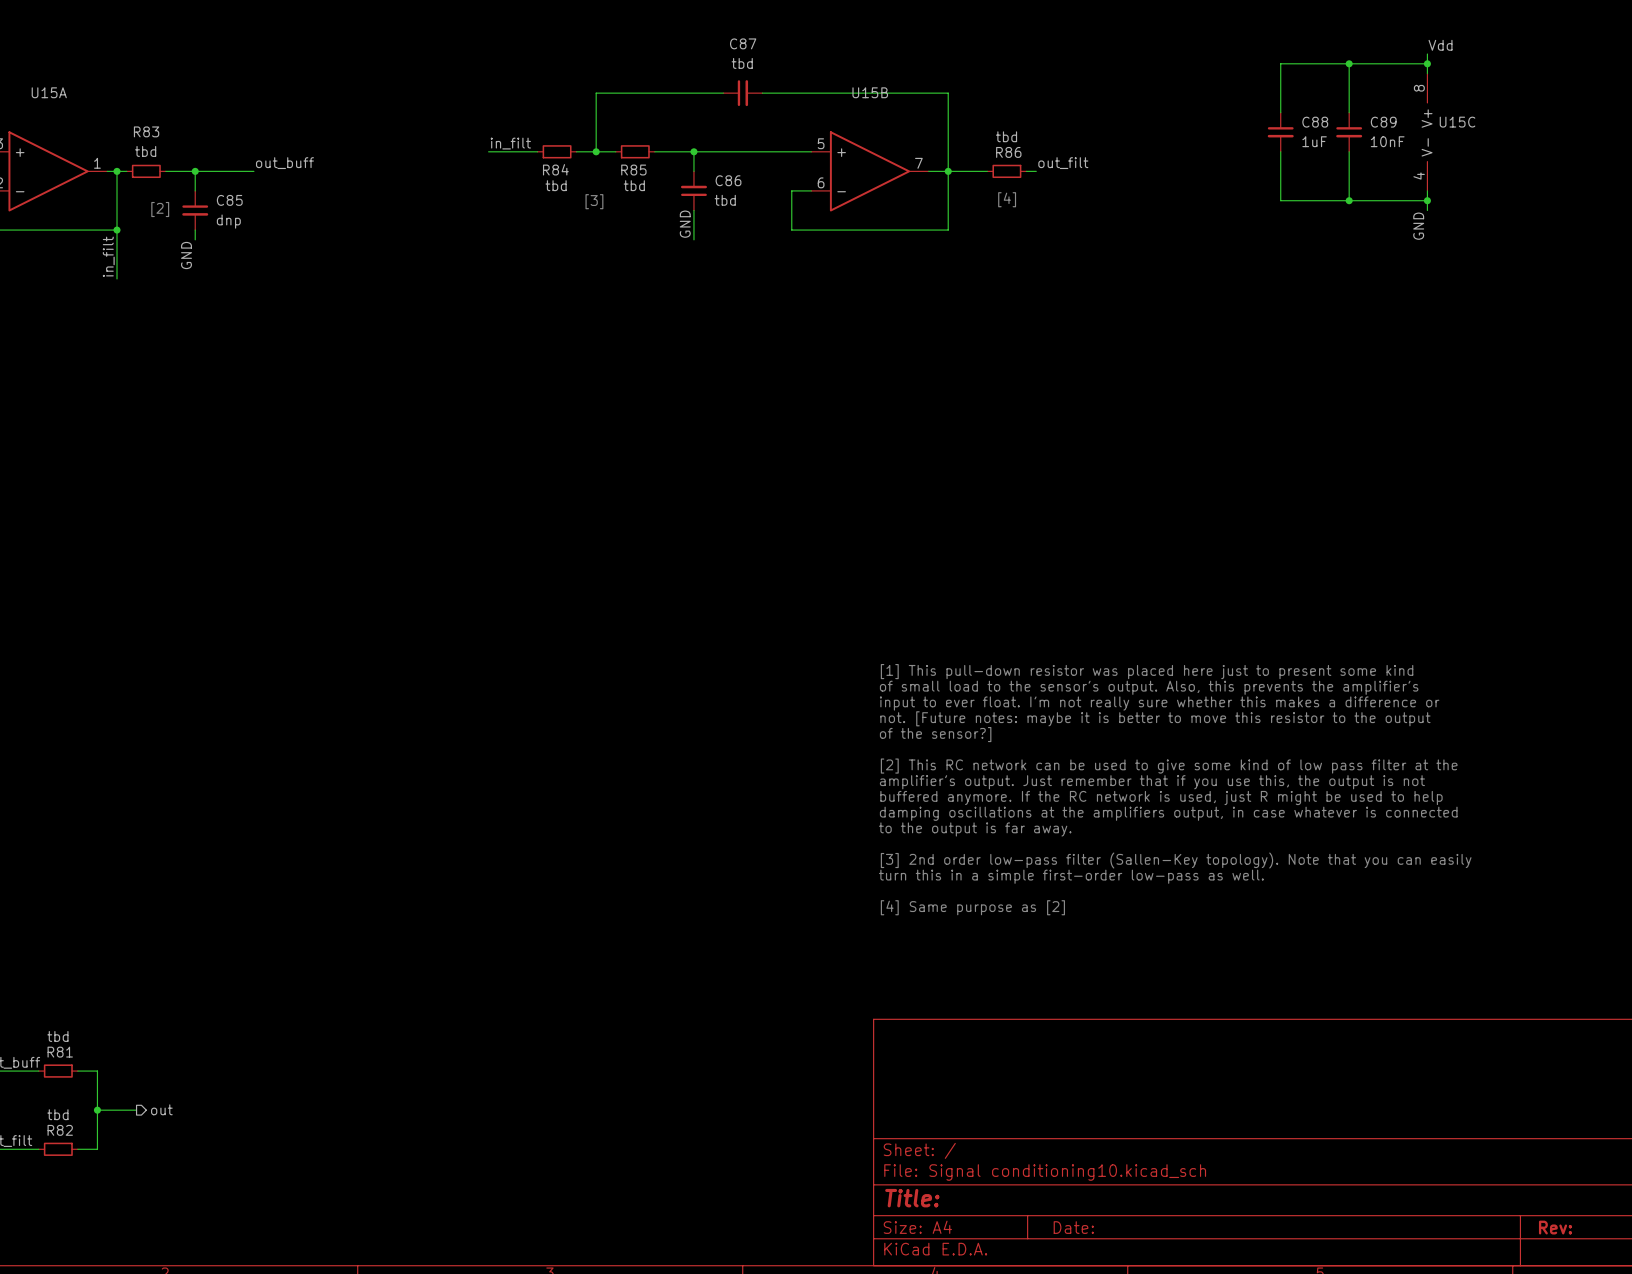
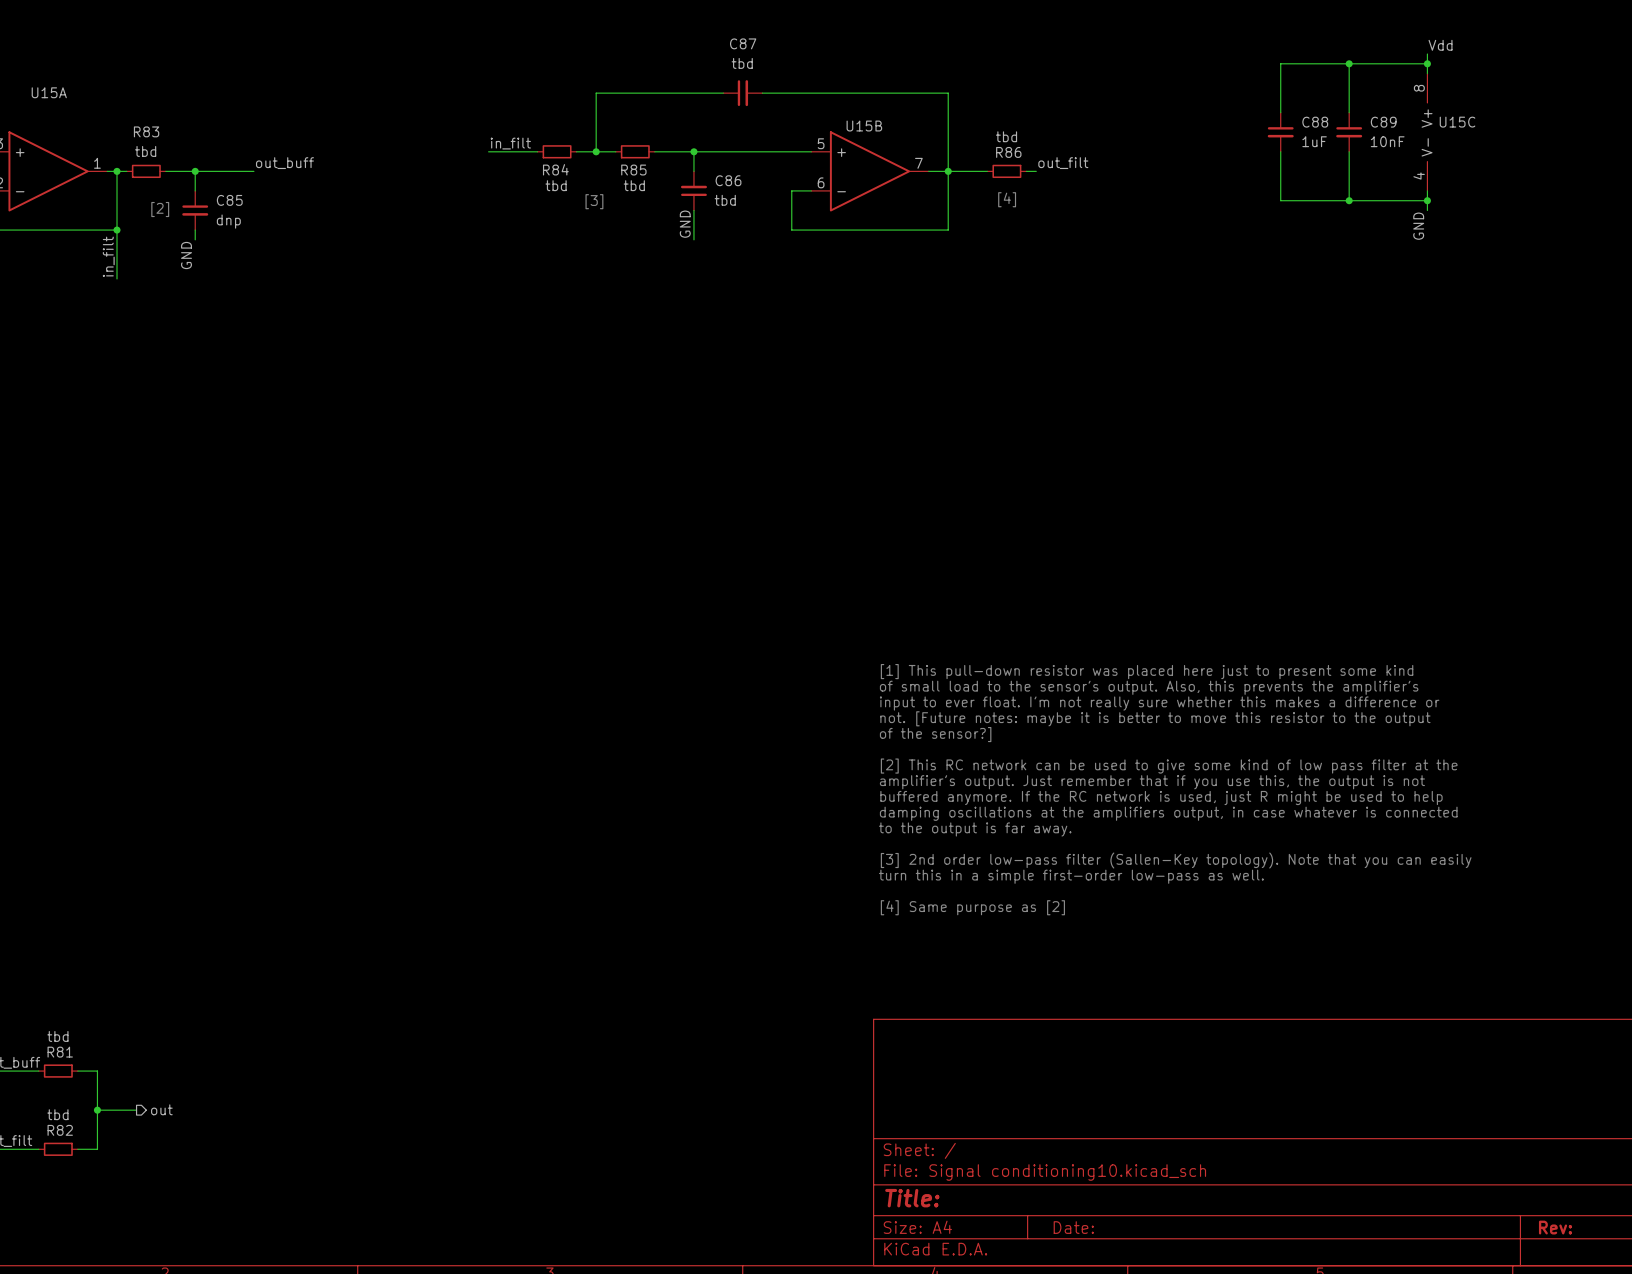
U15B name position: U15B (870, 92) -> U15B (864, 126)

